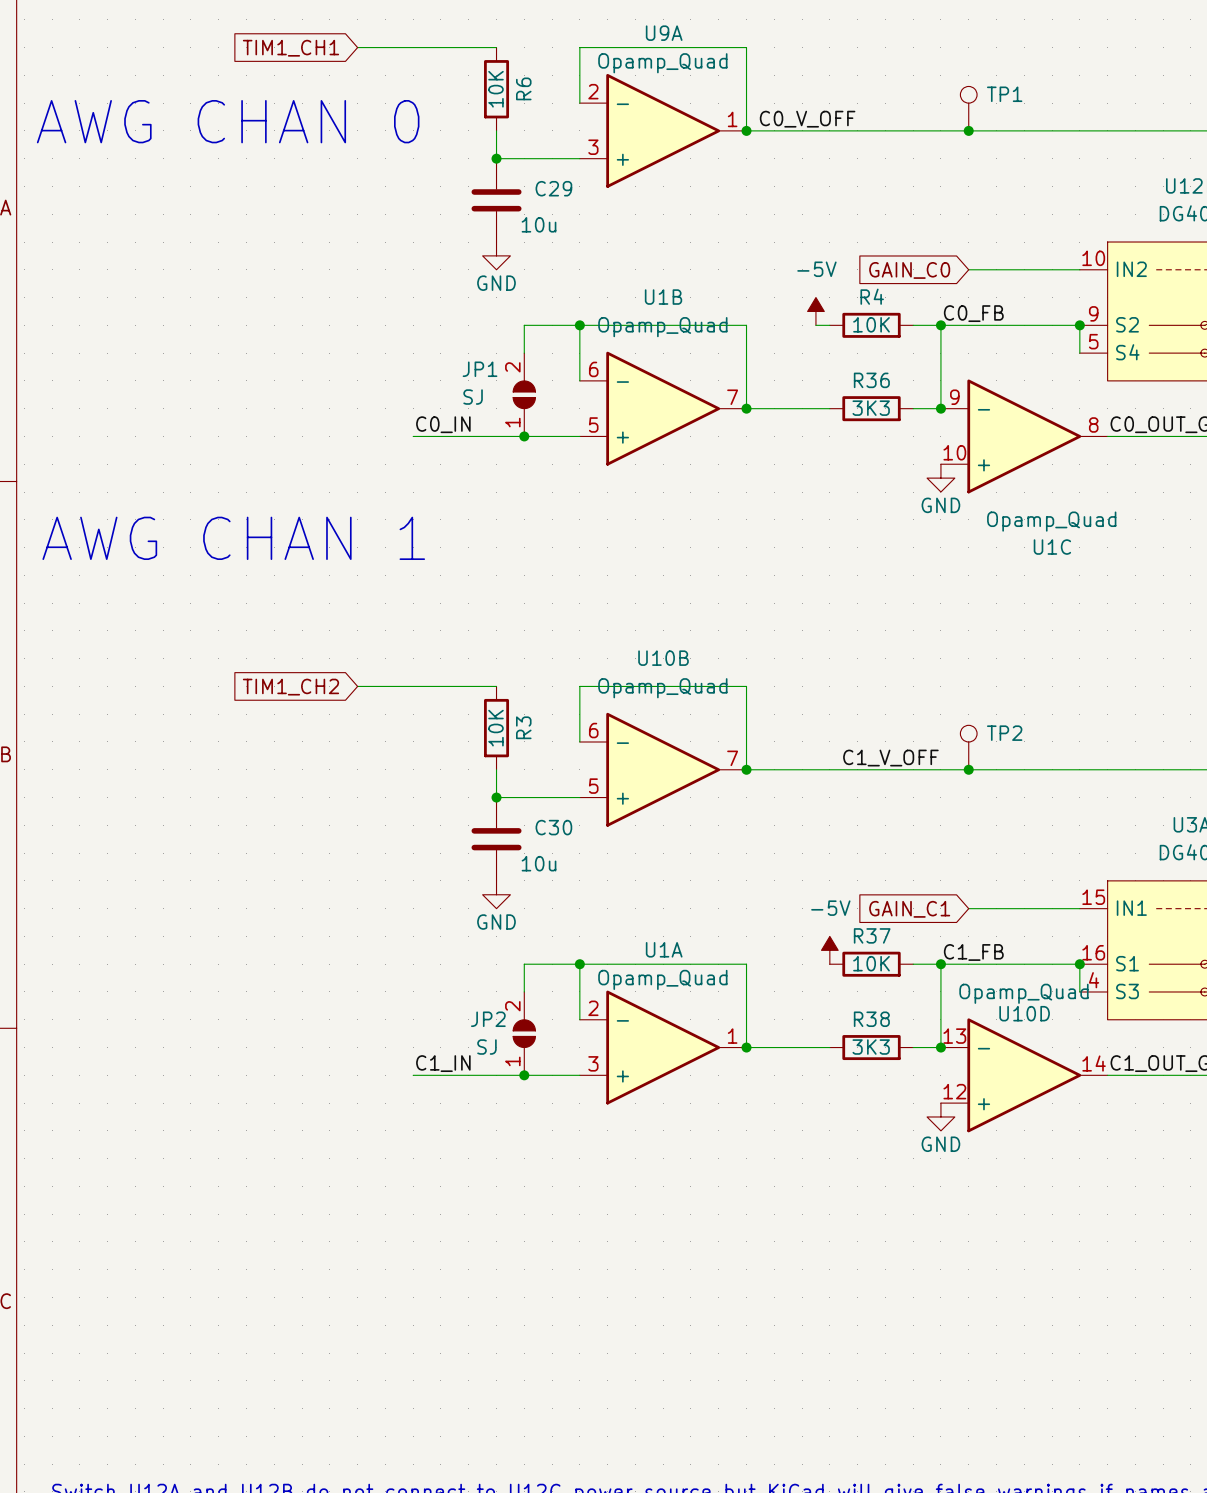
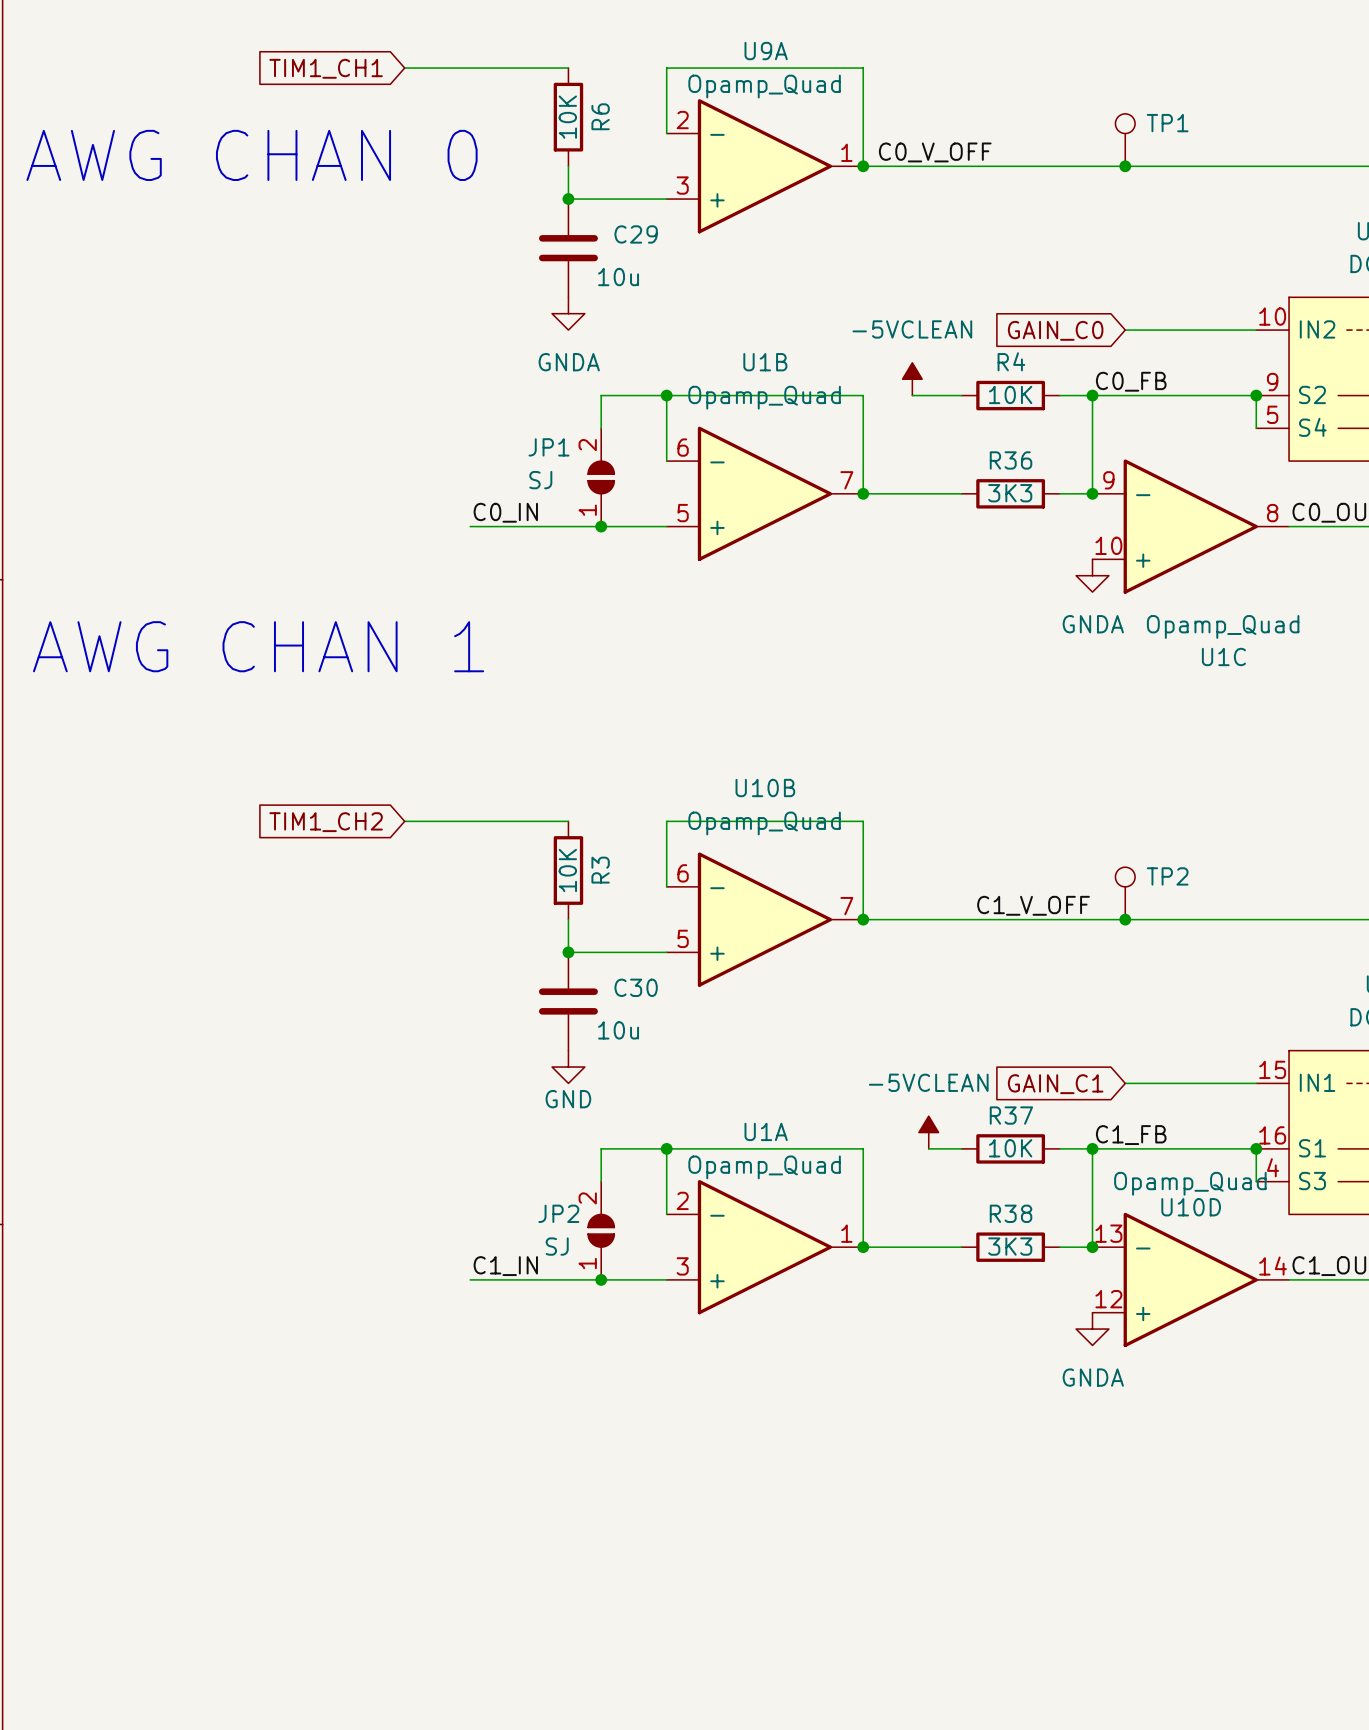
power symbol: GND (496, 255) -> GNDA (568, 313)
power symbol: none -> -5VCLEAN (912, 379)
power symbol: -5V (815, 311) -> none
wire: none -> (912, 395) (945, 395)
power symbol: GND (940, 478) -> GNDA (1092, 575)
power symbol: none -> -5VCLEAN (928, 1132)
power symbol: -5V (829, 950) -> none
wire: none -> (928, 1148) (961, 1148)
power symbol: GND (940, 1116) -> GNDA (1092, 1329)

